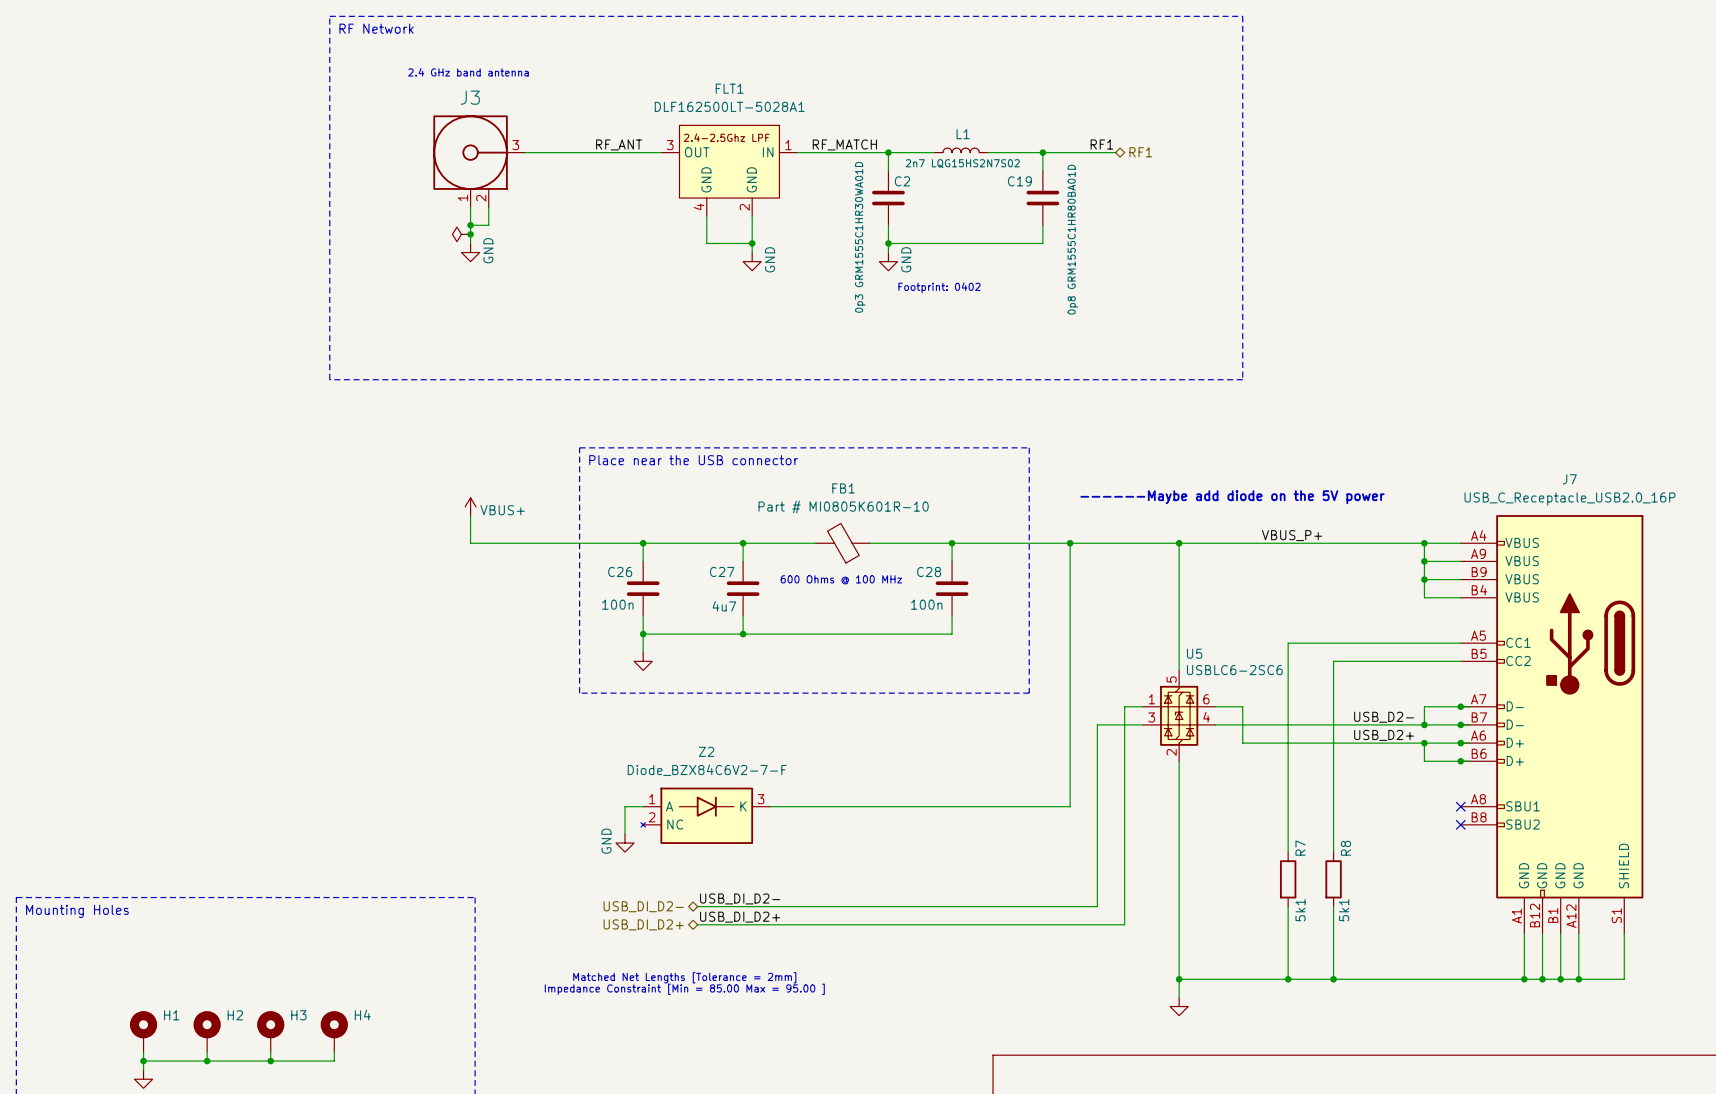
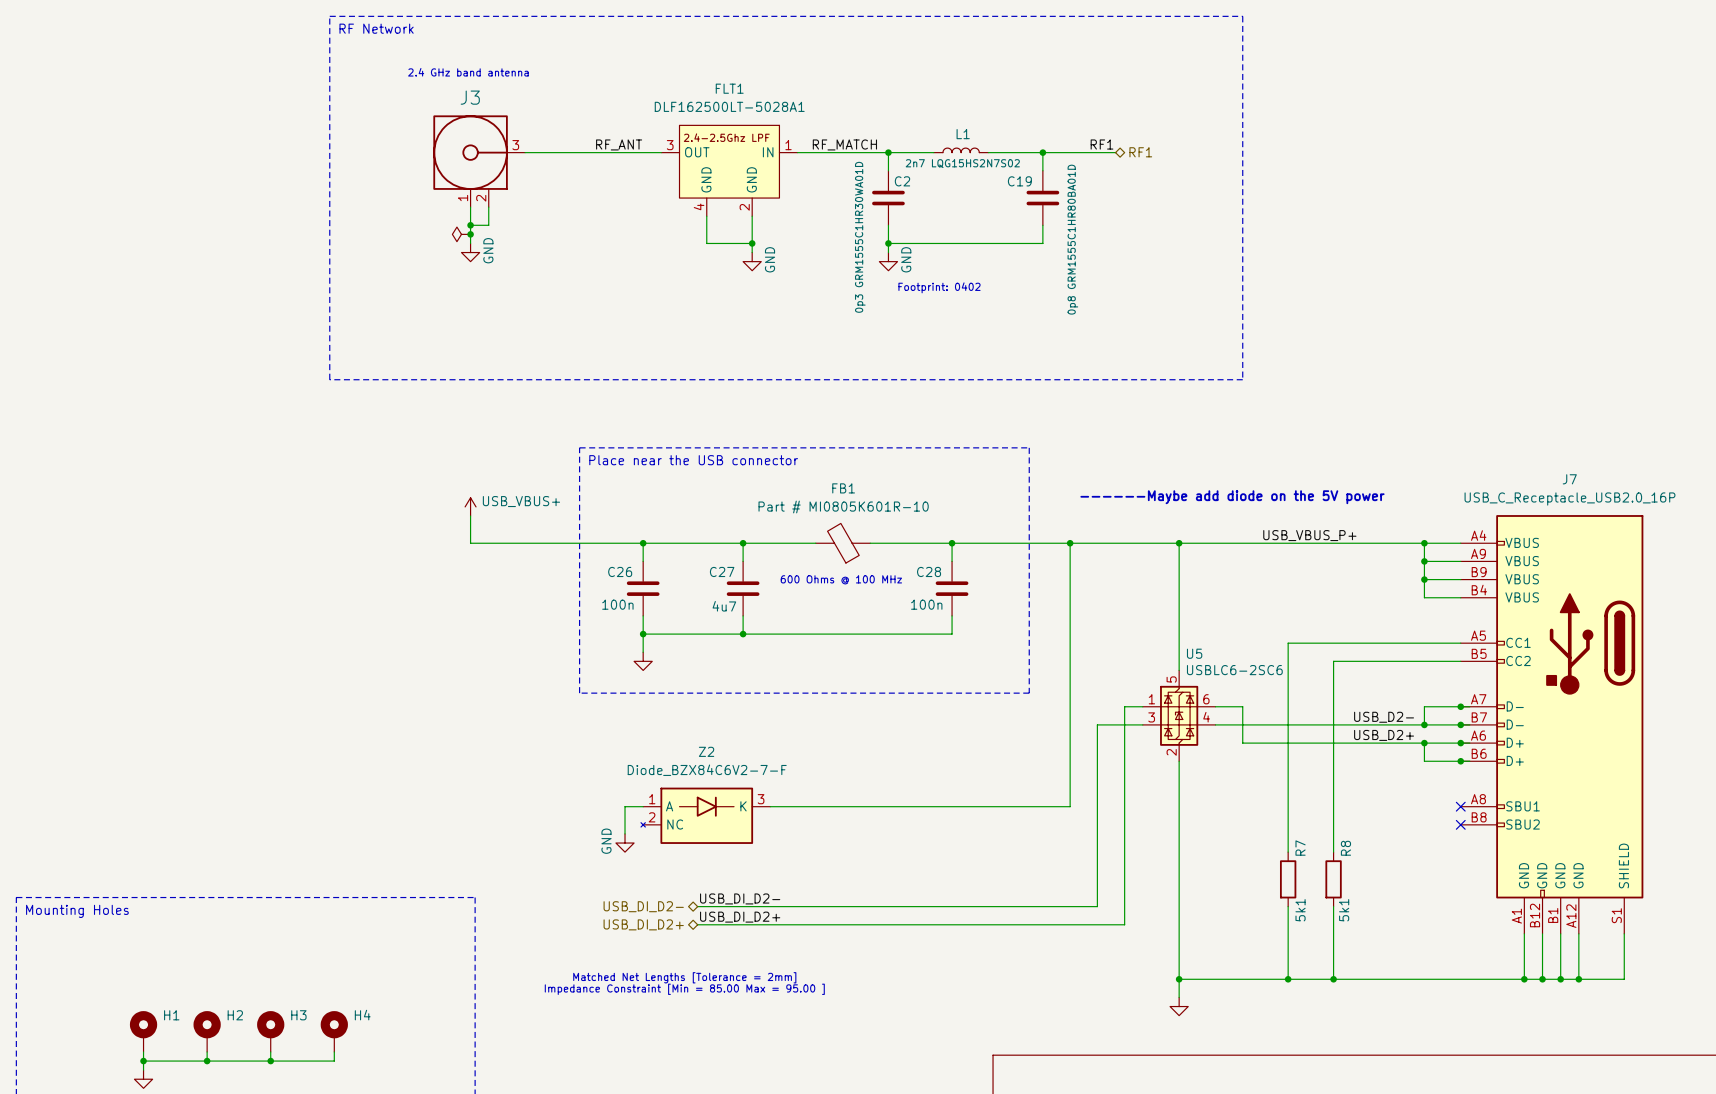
power symbol: VBUS+ (470, 506) -> USB_VBUS+ (470, 506)
label: VBUS_P+ (1292, 535) -> USB_VBUS_P+ (1309, 535)

